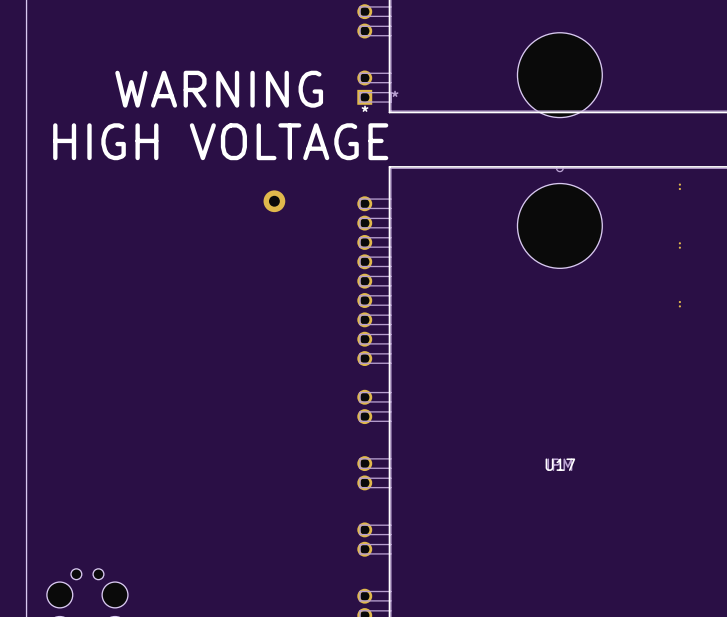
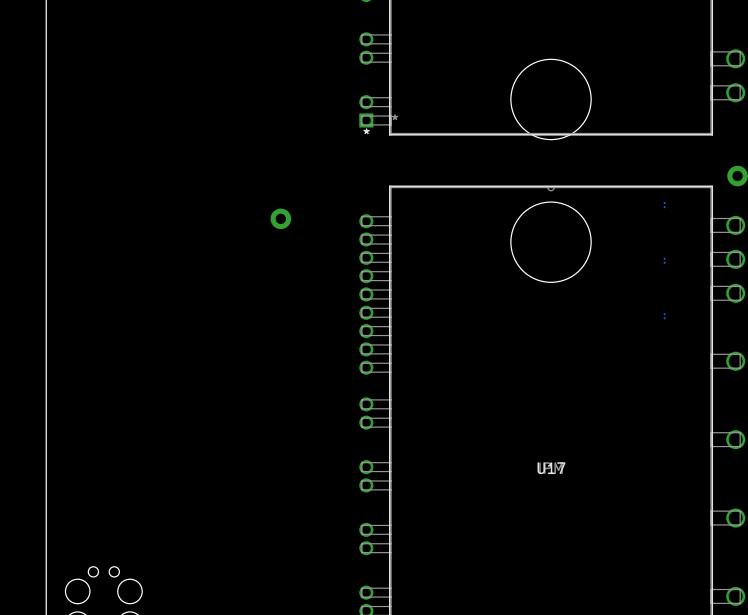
text: WARNING (219, 89) -> none
text: HIGH VOLTAGE (220, 141) -> none

